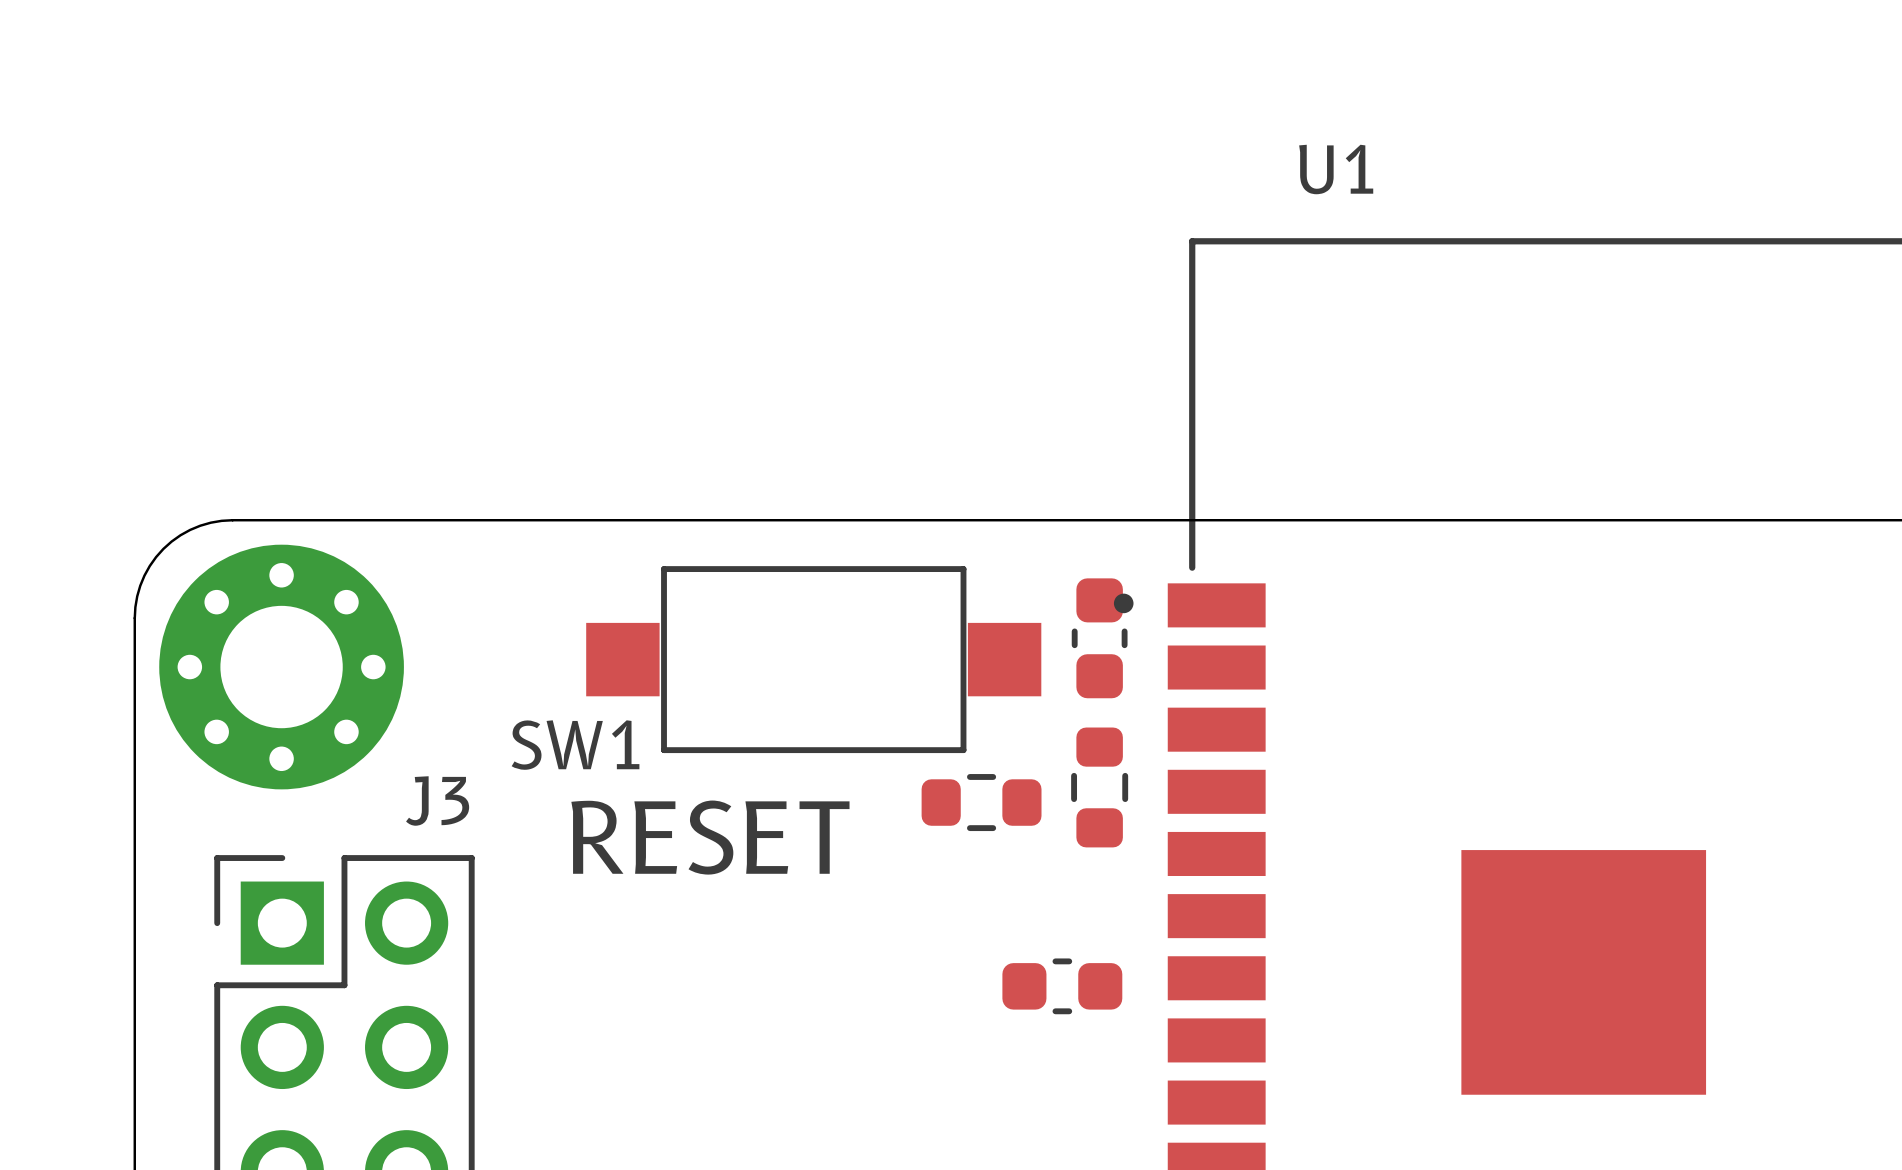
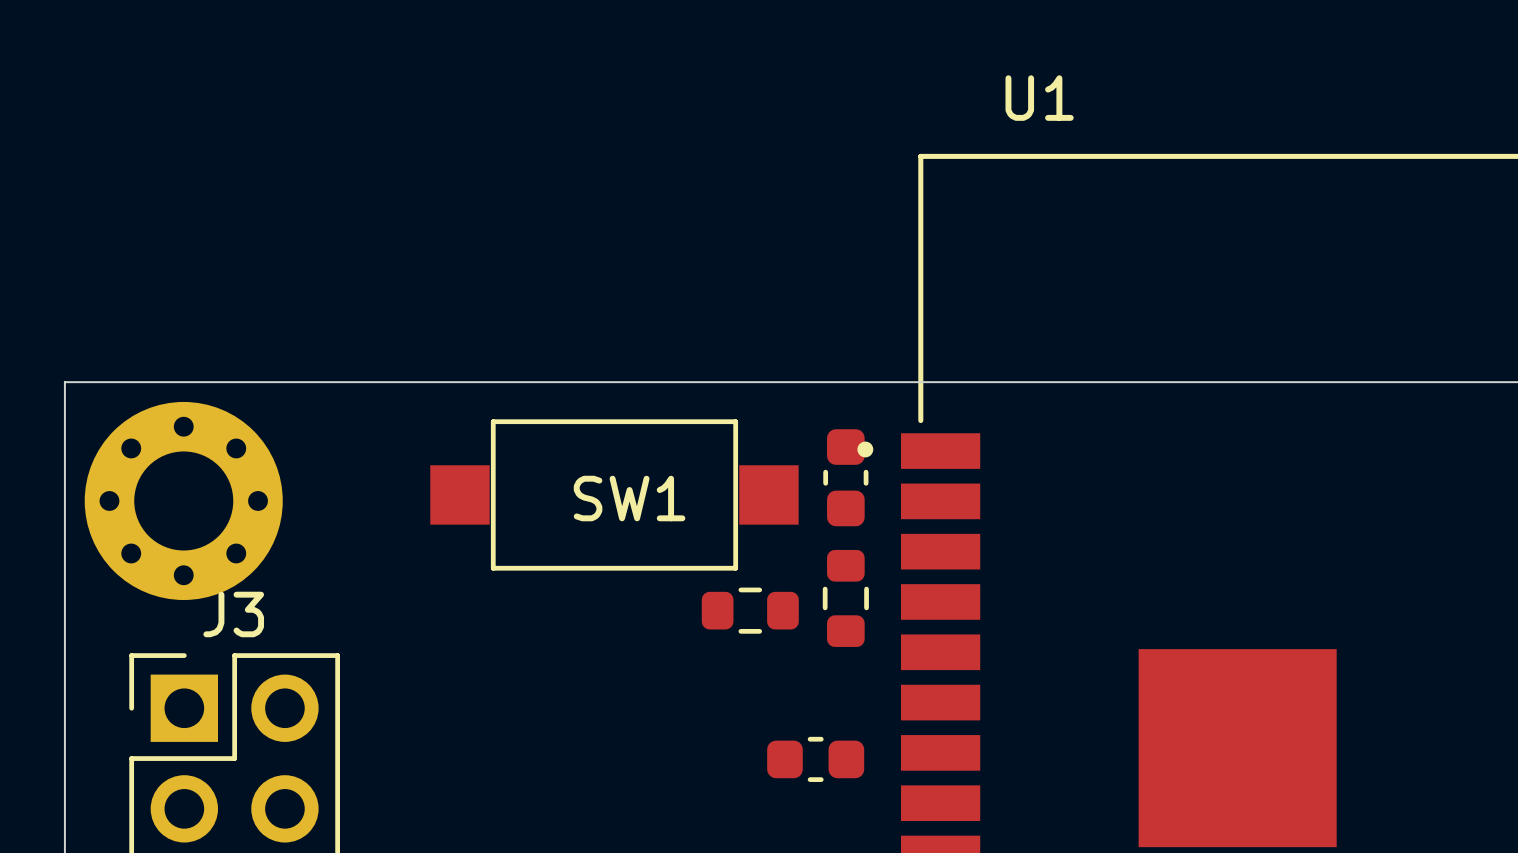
board edge: (232, 520) (200, 525) (180, 535) (163, 548) (149, 566) (140, 585) (134, 618) -> (144, 382) (64, 382) (64, 461)
SW1 name position: SW1 (575, 745) -> SW1 (629, 498)
J3 name position: J3 (437, 800) -> J3 (233, 614)
text: RESET (710, 837) -> none

